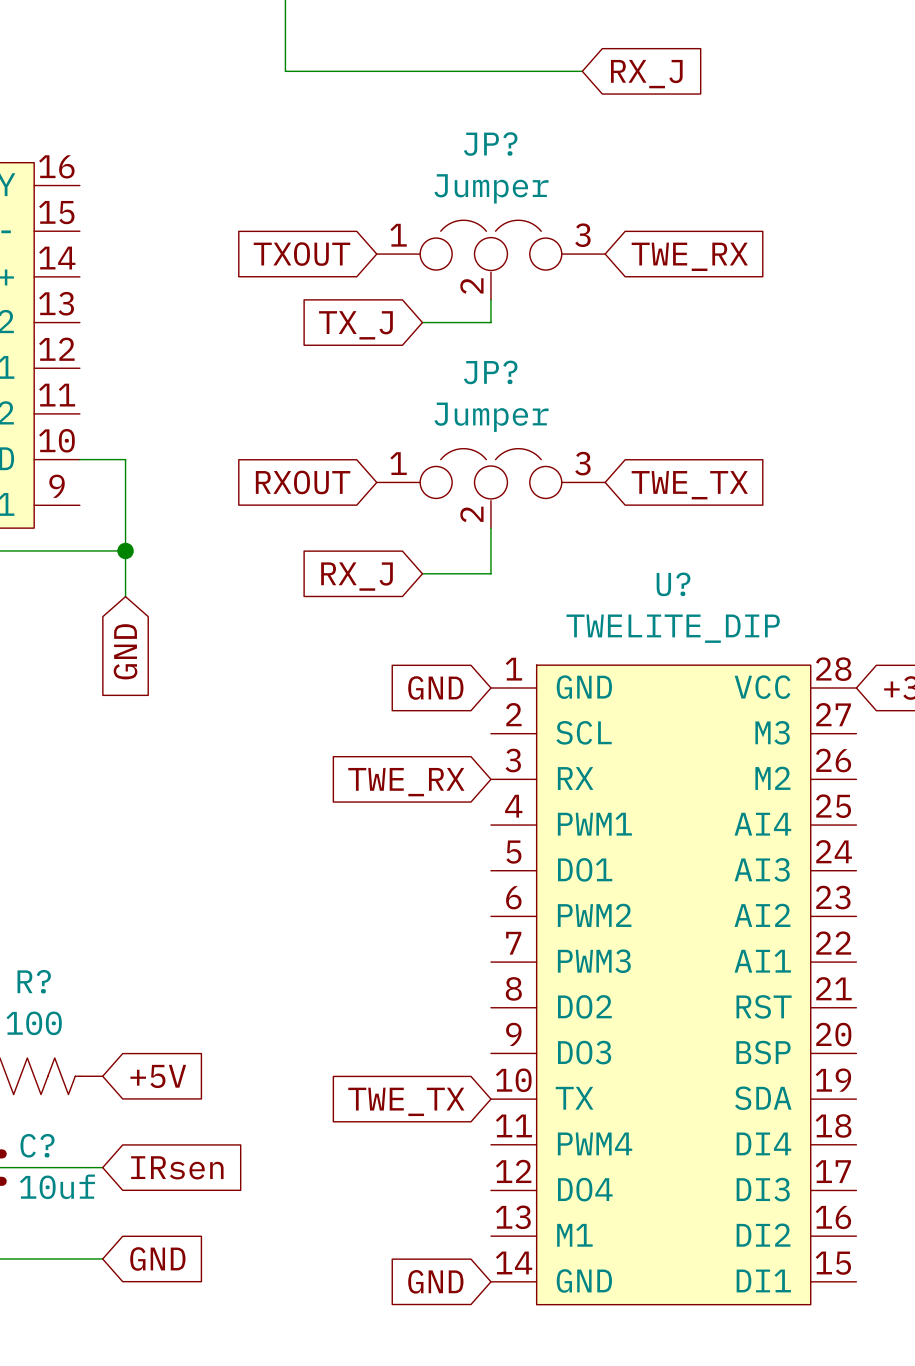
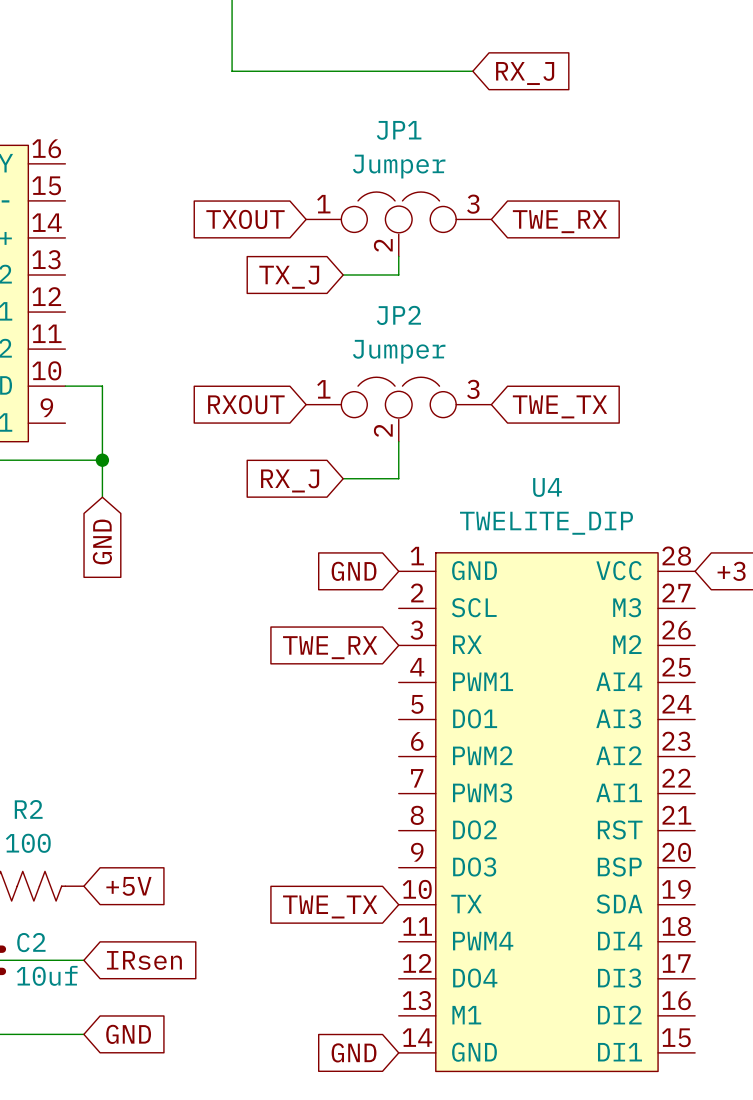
JP? name: JP? (490, 144) -> JP1 (399, 130)
JP? name: JP? (490, 372) -> JP2 (398, 315)
U? name: U? (673, 584) -> U4 (547, 487)
R? name: R? (34, 981) -> R2 (28, 809)
C? name: C? (37, 1145) -> C2 (31, 942)

